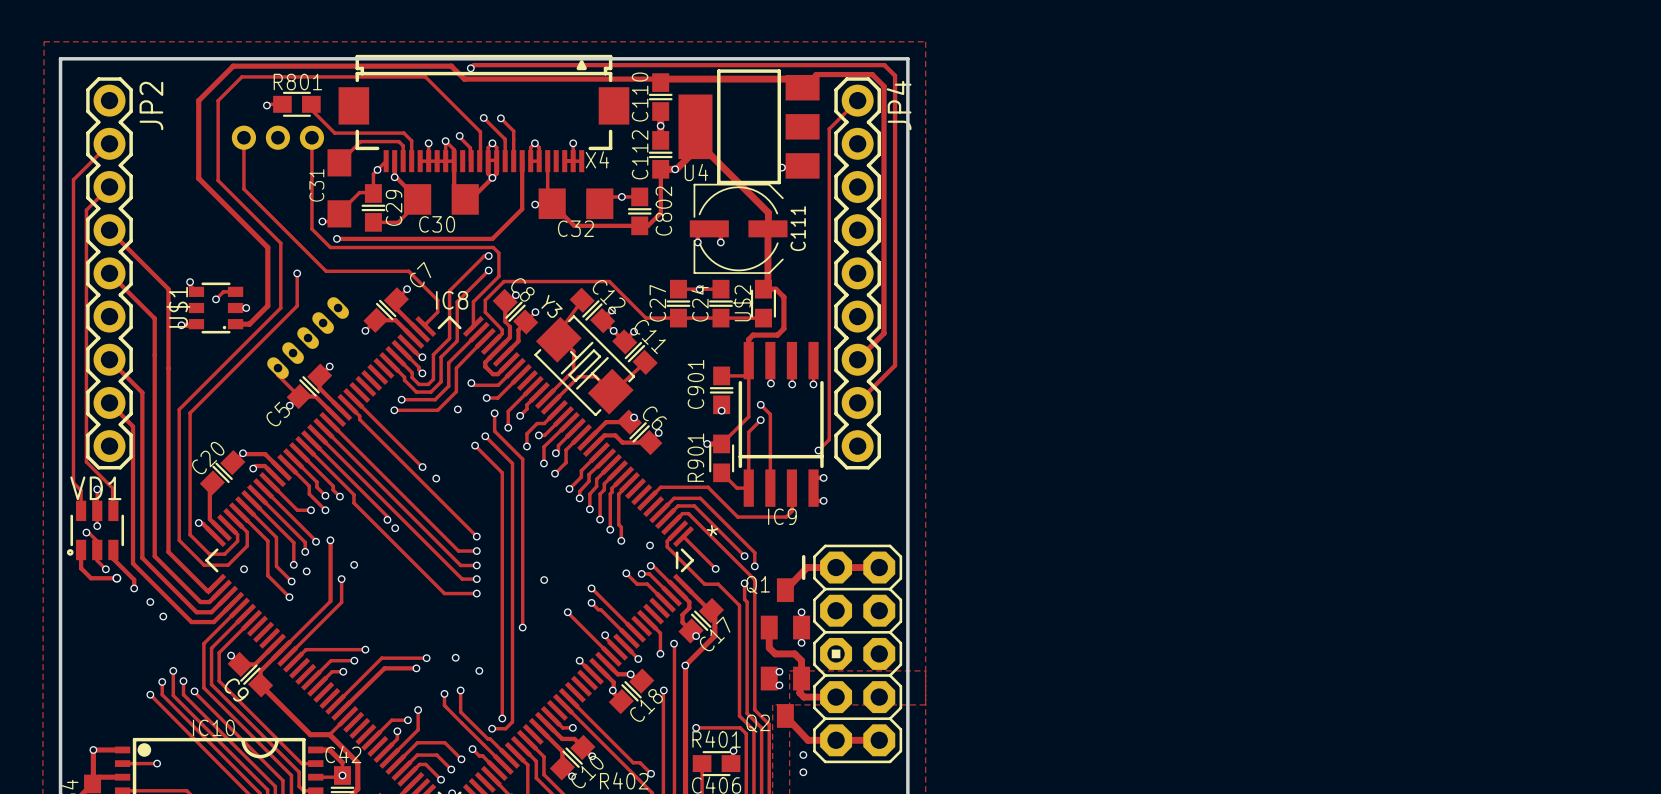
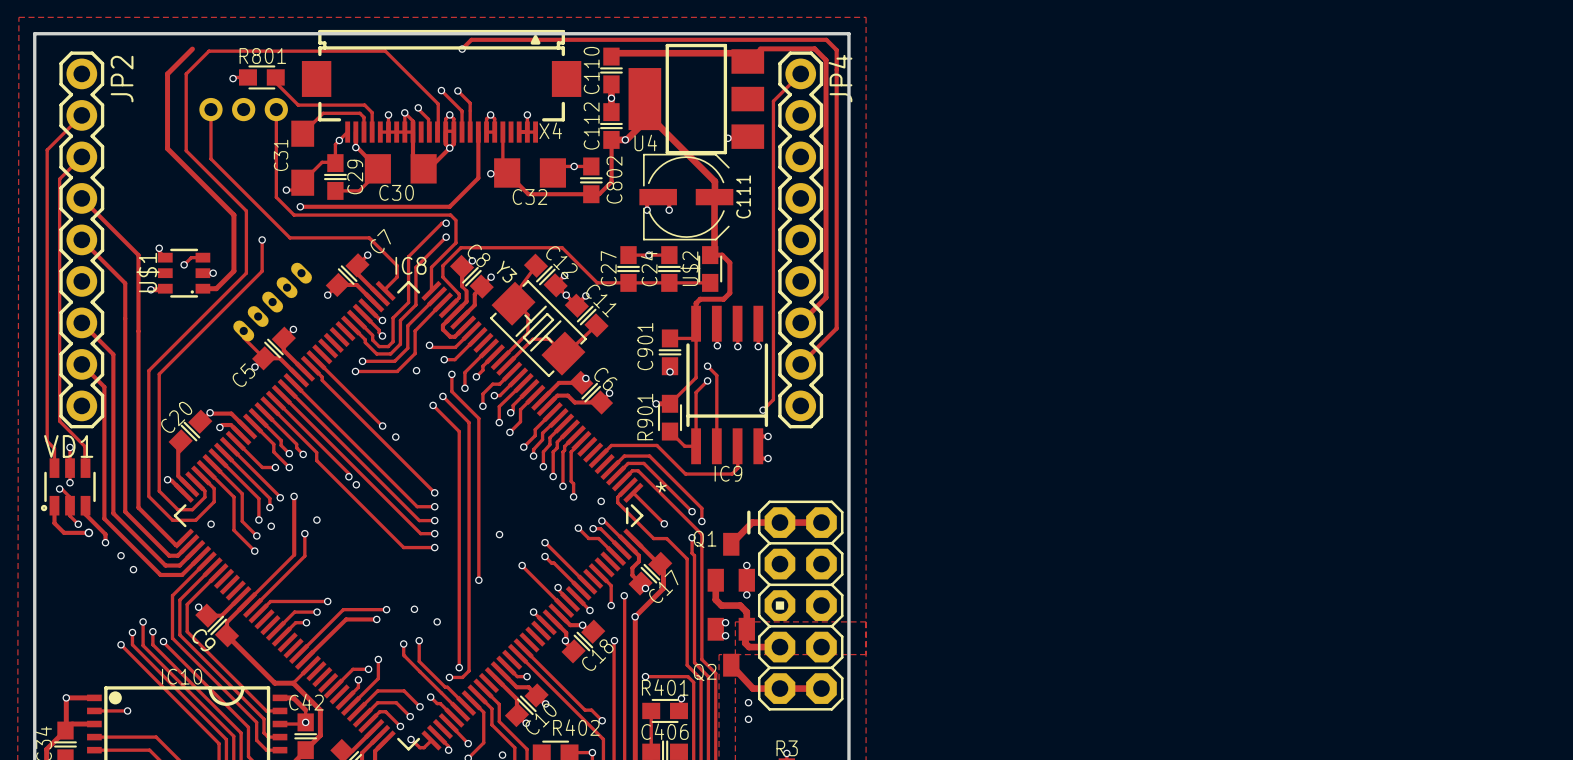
track: (515, 65) (473, 65) (470, 68) -> (471, 39) (462, 49)
via position: (470, 68) -> (462, 49)
track: (224, 74) (233, 66) (451, 66) (464, 79) (656, 79) (660, 82) -> none

